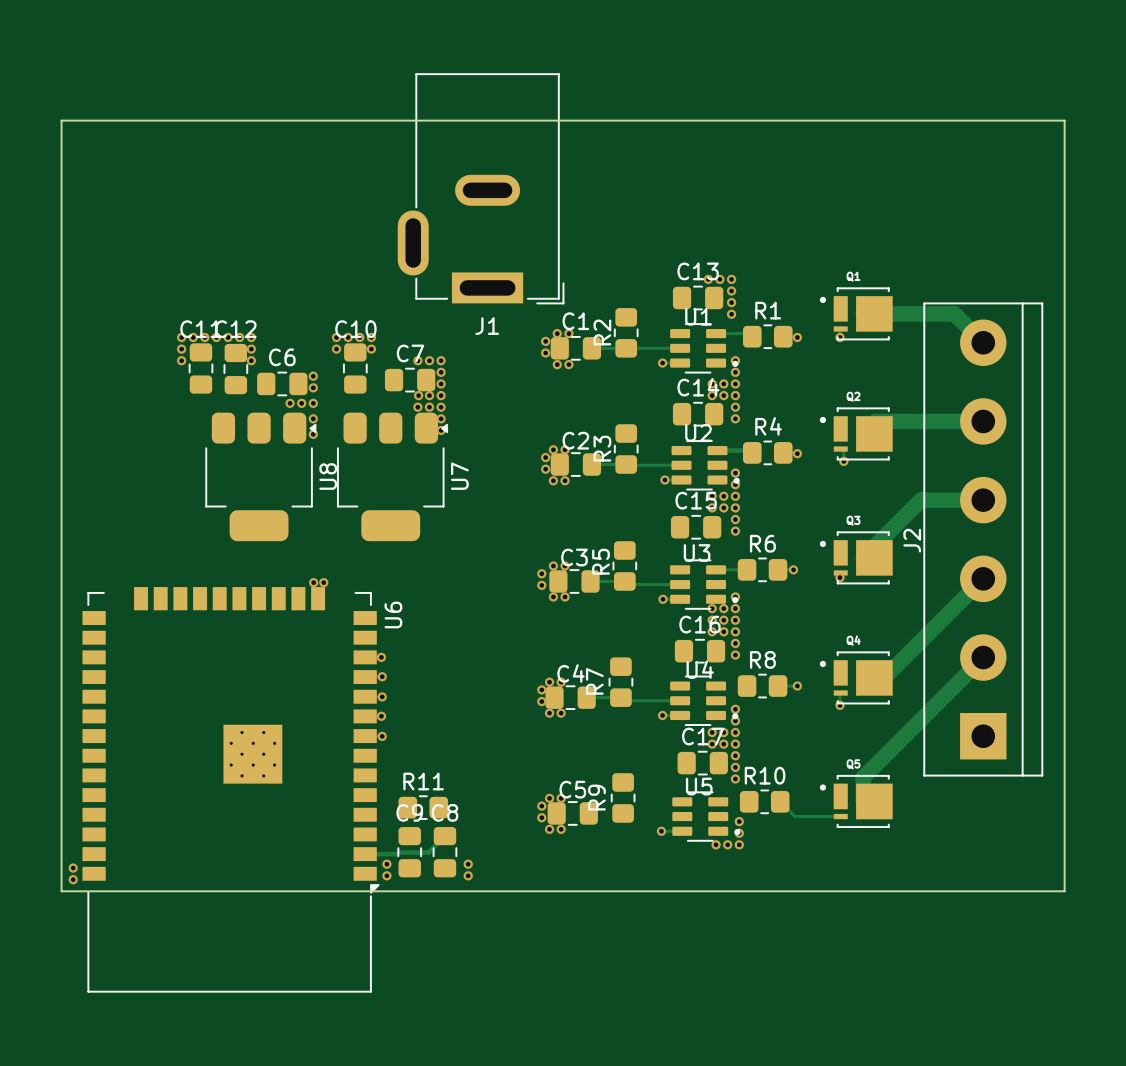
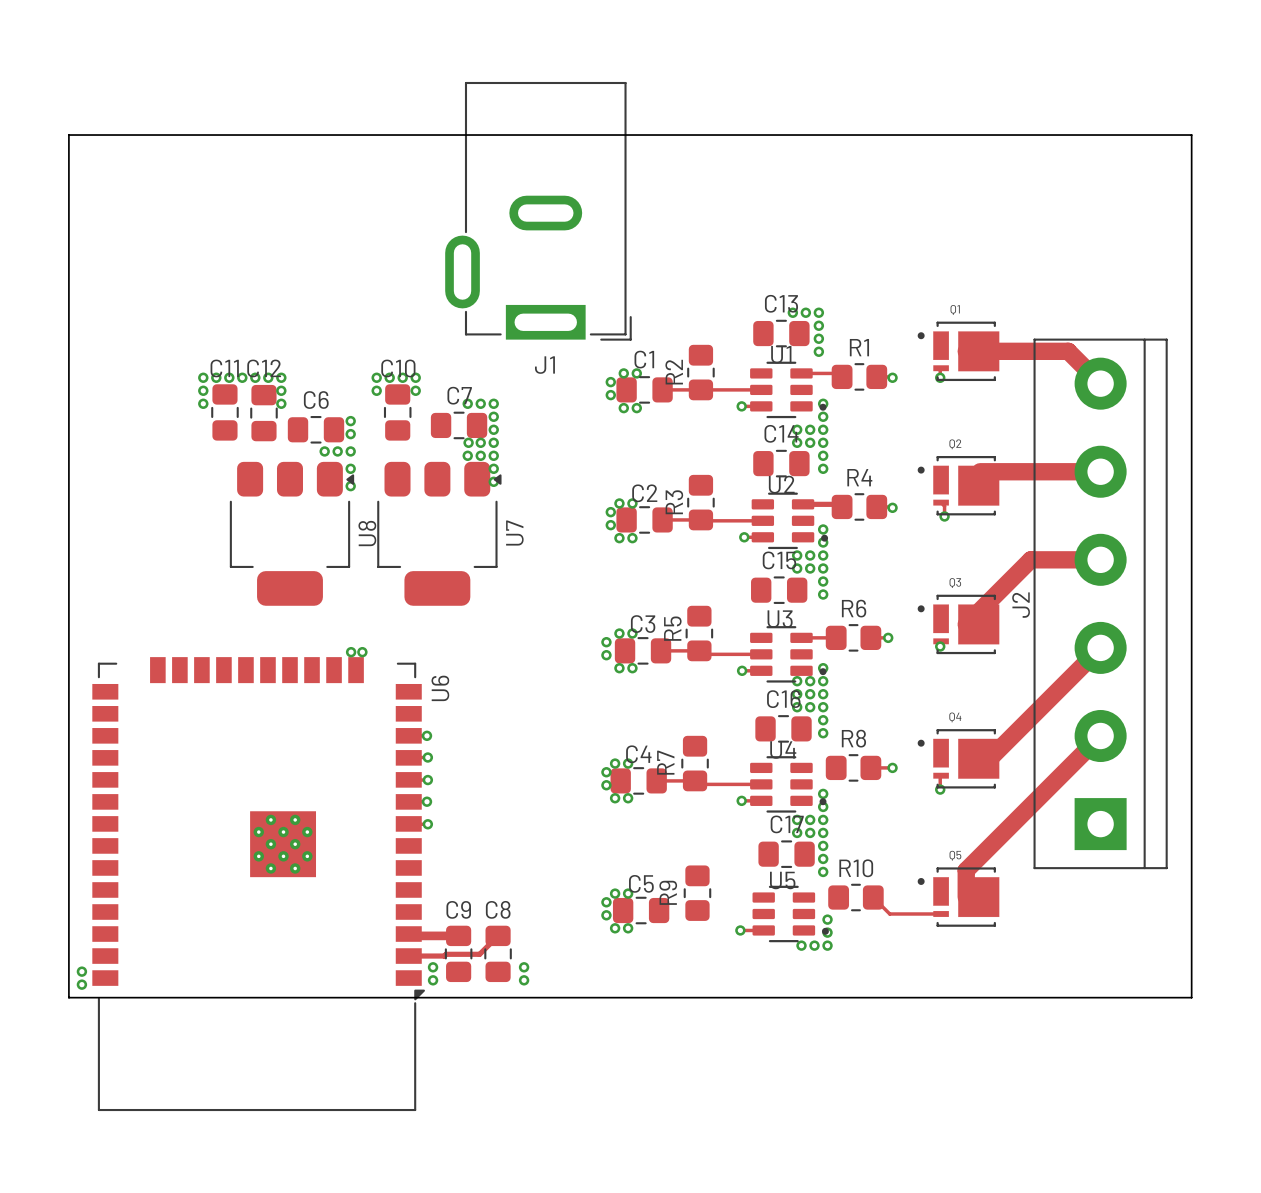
R11: (423, 807) -> none
track: none -> (410, 935) (458, 935)

